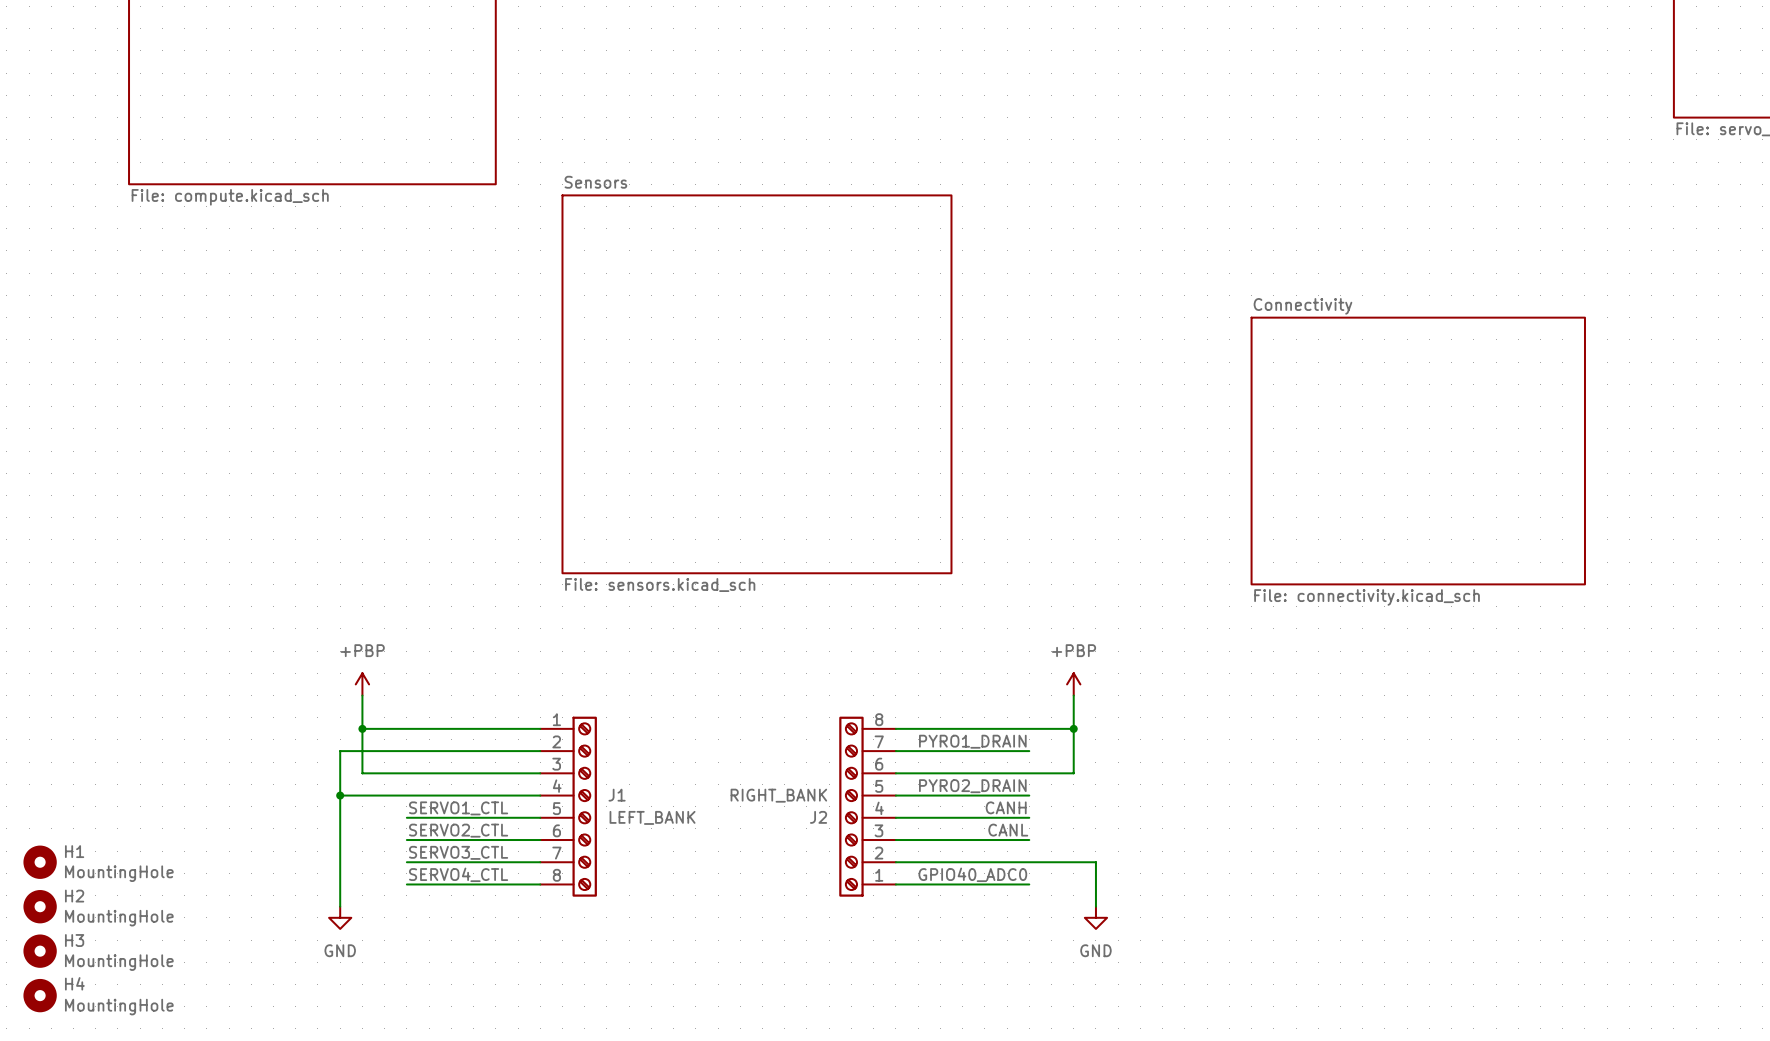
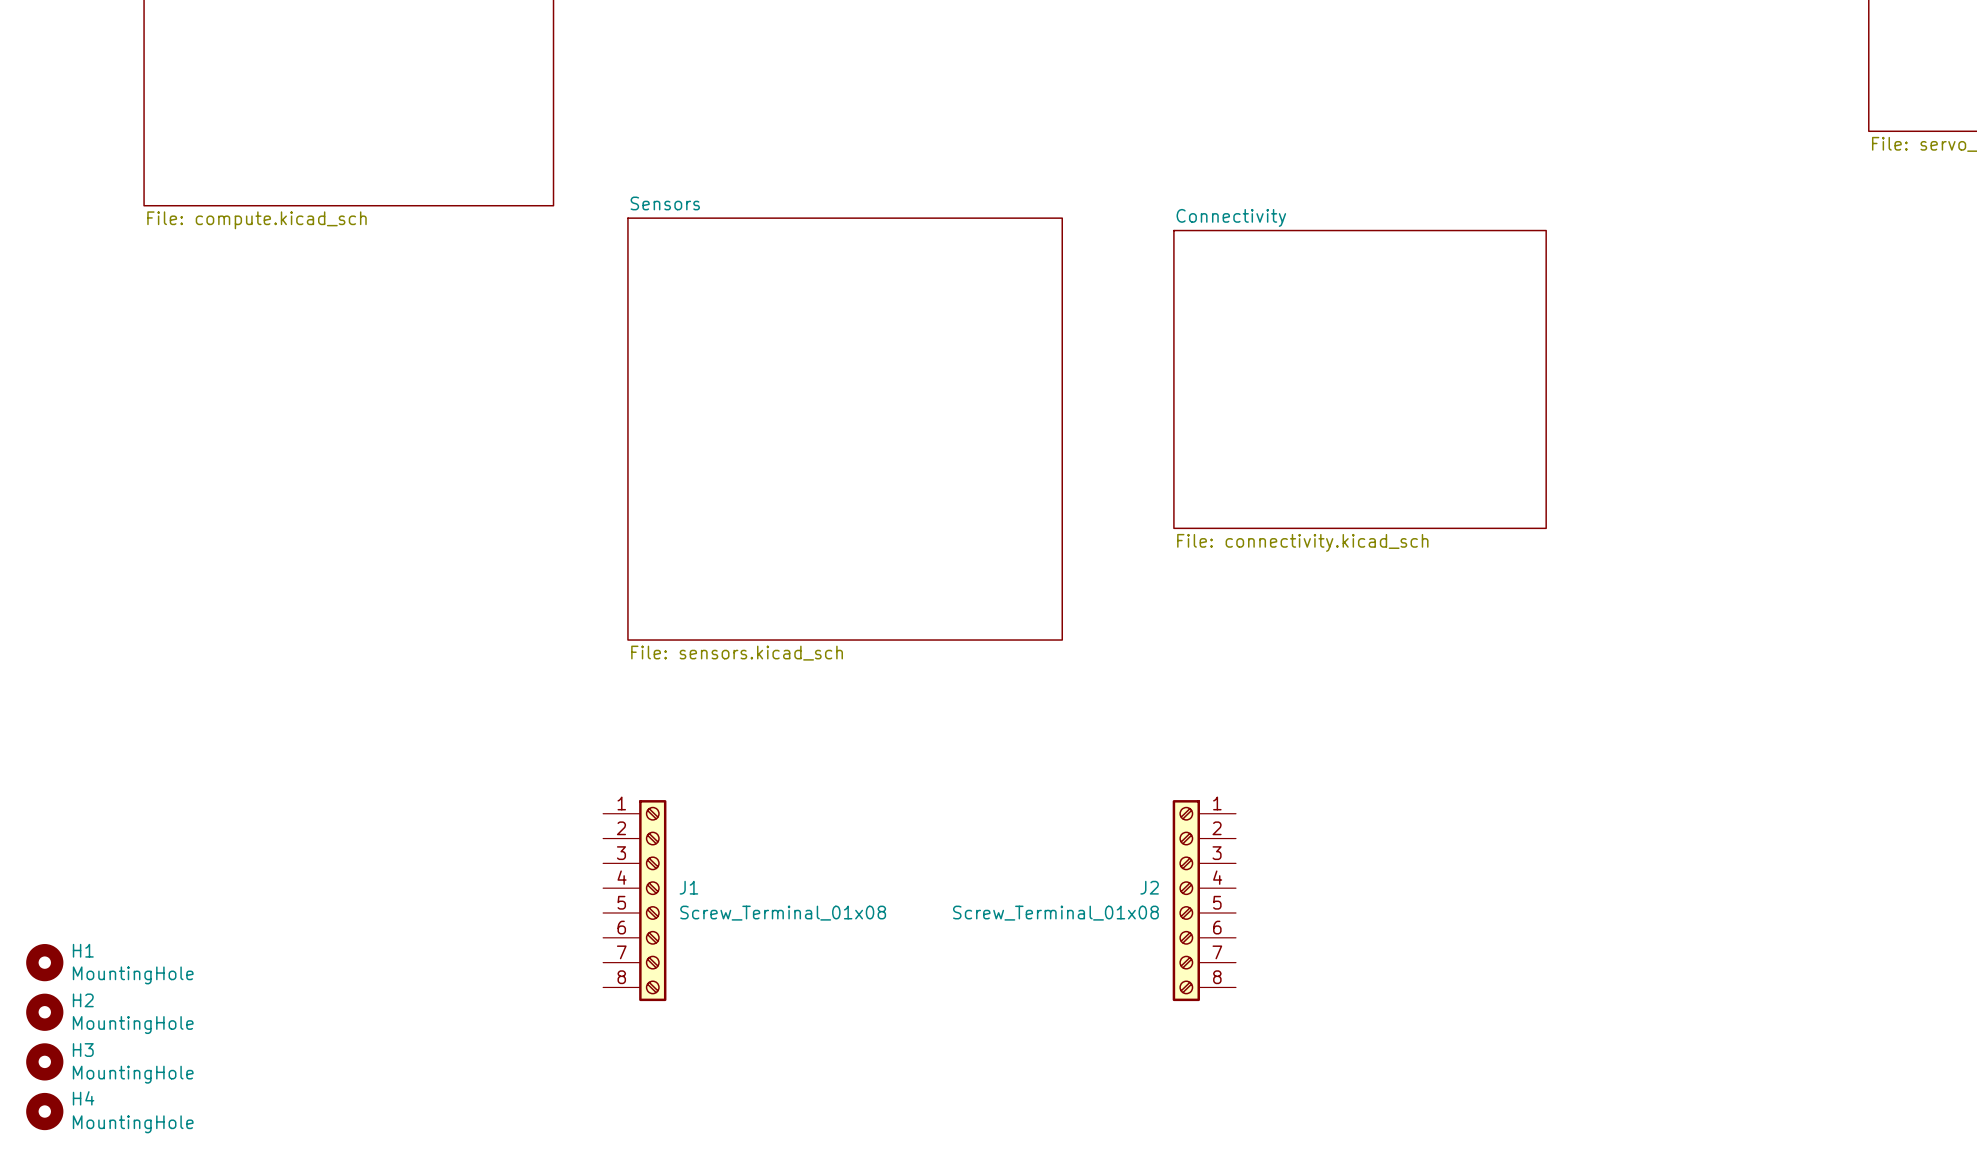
sheet Connectivity: none -> File: connectivity.kicad_sch (1360, 379)
sheet Connectivity: File: connectivity.kicad_sch (1418, 451) -> none
power symbol: +PBP (362, 684) -> none
power symbol: +PBP (1073, 684) -> none
wire: (362, 695) (362, 773) (540, 773) -> none
wire: (1073, 695) (1073, 773) (895, 773) -> none
wire: (362, 728) (540, 728) -> none
junction: (362, 728) -> none
wire: (895, 728) (1073, 728) -> none
junction: (1073, 728) -> none
label: PYRO1_DRAIN (972, 741) -> none
wire: (540, 751) (340, 751) (340, 906) -> none
wire: (895, 751) (1029, 751) -> none
label: PYRO2_DRAIN (972, 786) -> none
wire: (340, 795) (540, 795) -> none
junction: (340, 795) -> none
J2 value: RIGHT_BANK (778, 795) -> Screw_Terminal_01x08 (1055, 913)
wire: (895, 795) (1029, 795) -> none
J2 flip: as is (851, 806) -> up-down (1186, 900)
J2 position: (867, 806) -> (1204, 900)
label: CANH (1006, 807) -> none
label: SERVO1_CTL (458, 808) -> none
wire: (406, 817) (540, 817) -> none
J1 value: LEFT_BANK (652, 817) -> Screw_Terminal_01x08 (783, 913)
wire: (895, 817) (1029, 817) -> none
label: SERVO2_CTL (458, 830) -> none
label: CANL (1008, 830) -> none
wire: (406, 840) (540, 840) -> none
wire: (895, 840) (1029, 840) -> none
label: SERVO3_CTL (458, 852) -> none
wire: (406, 862) (540, 862) -> none
wire: (895, 862) (1095, 862) (1095, 906) -> none
label: SERVO4_CTL (458, 874) -> none
label: GPIO40_ADC0 (972, 874) -> none
wire: (406, 884) (540, 884) -> none
wire: (895, 884) (1029, 884) -> none
power symbol: GND (340, 917) -> none
power symbol: GND (1095, 917) -> none

